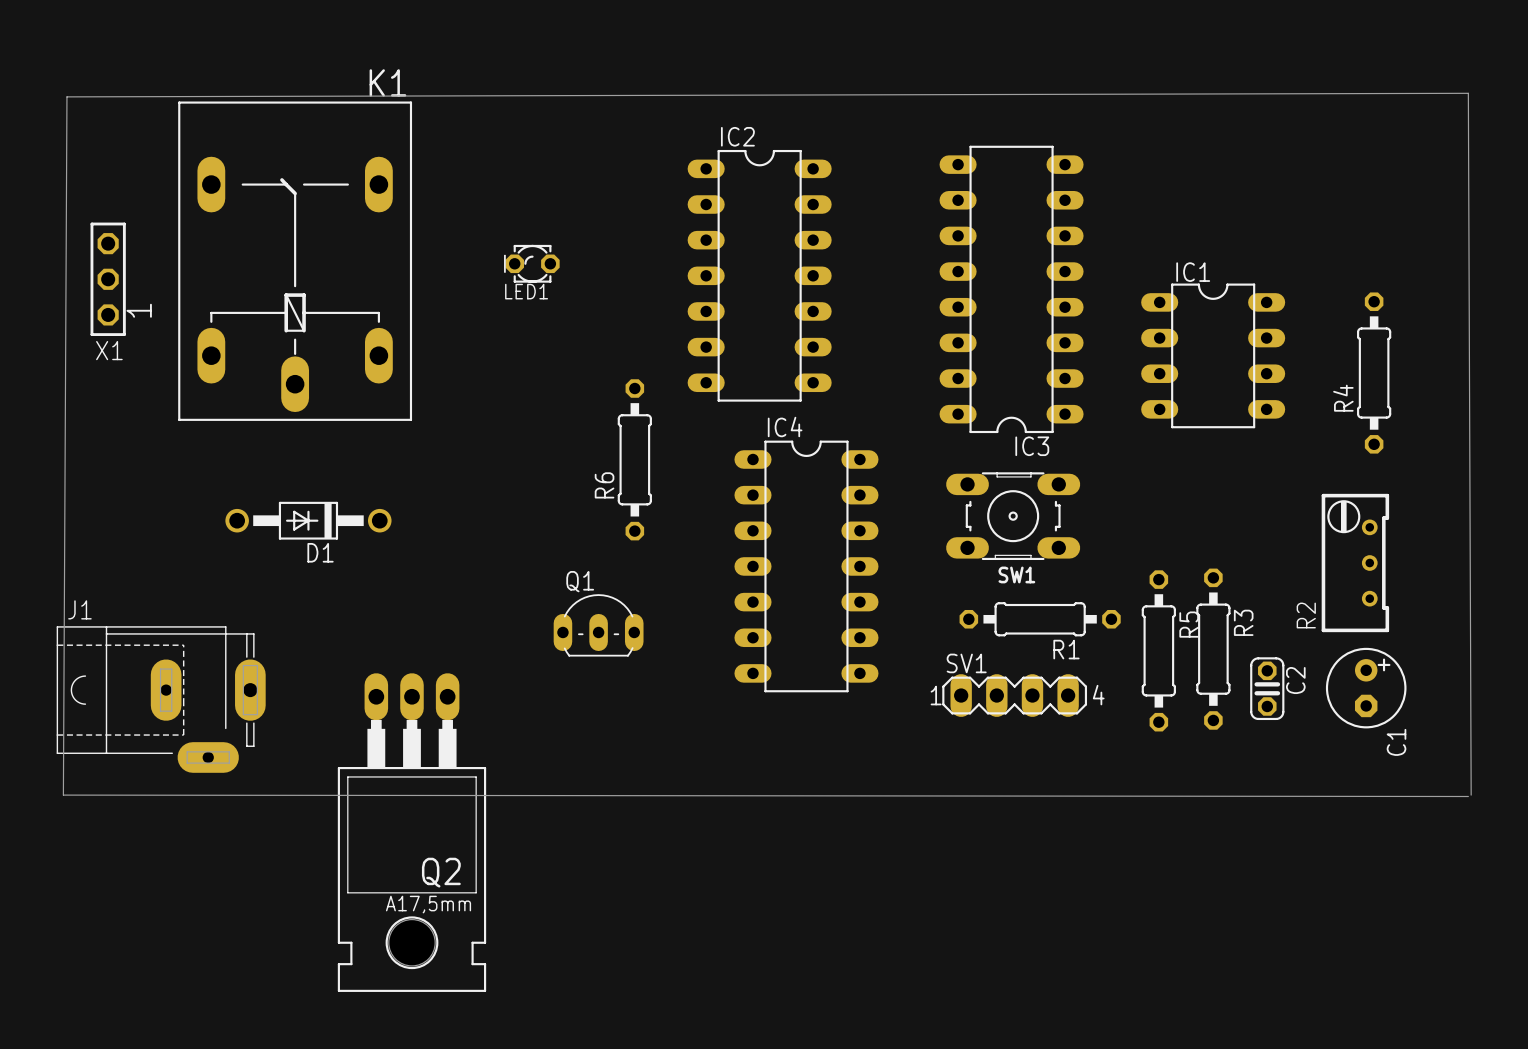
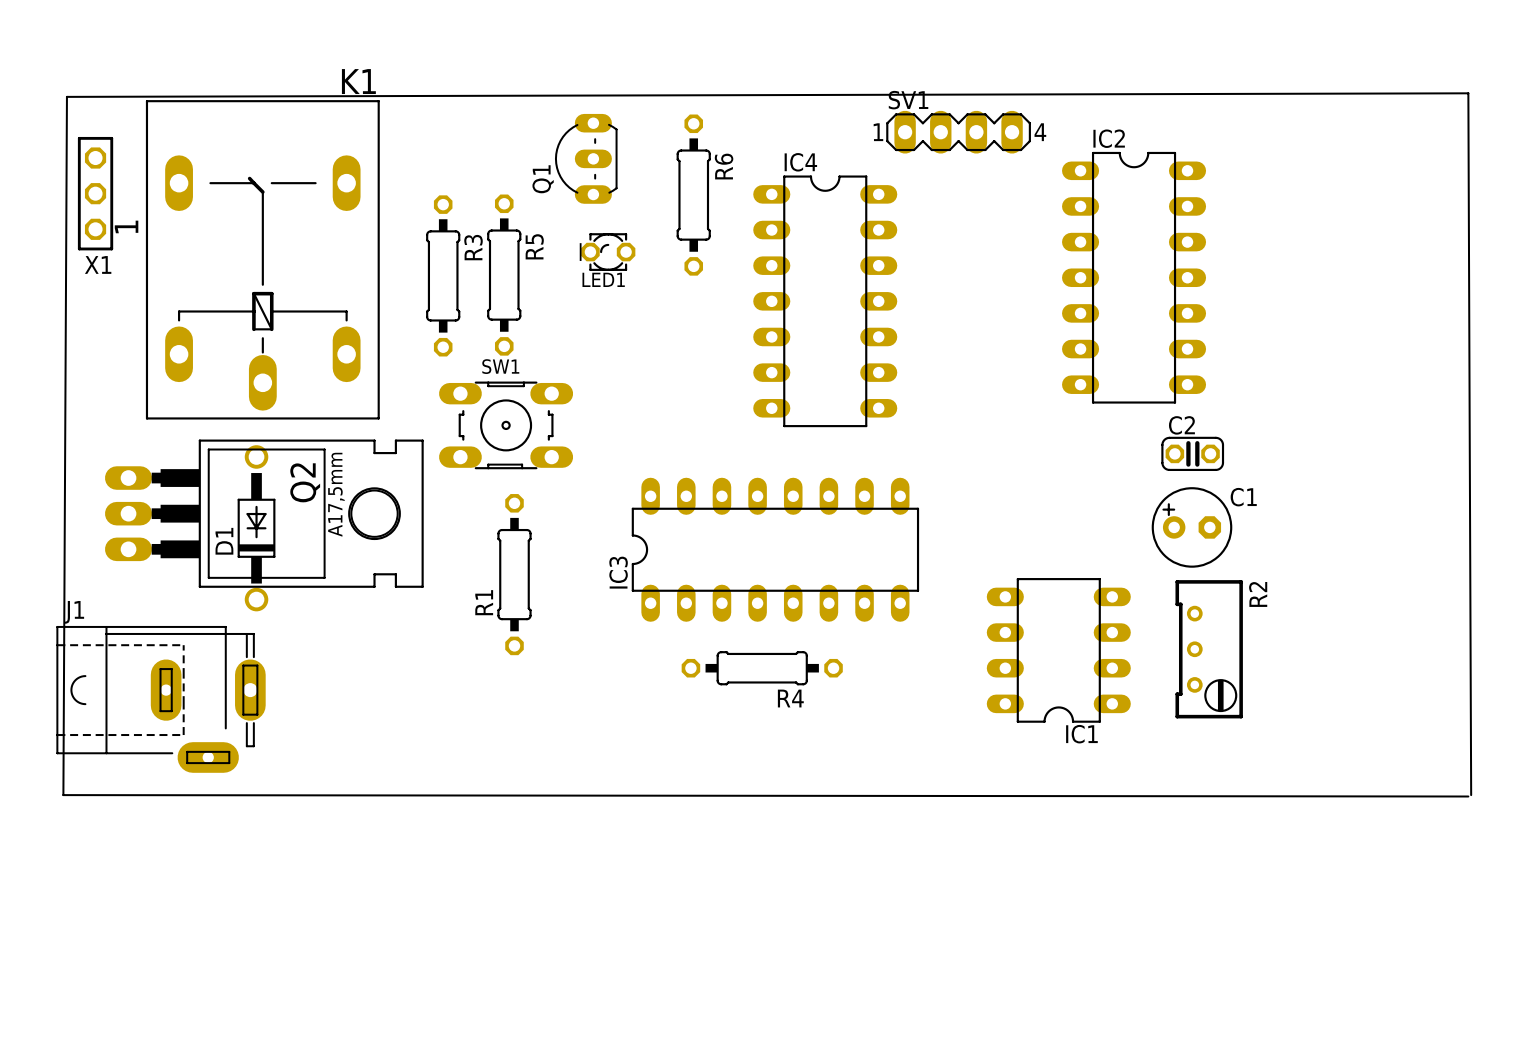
K1 position: (295, 261) -> (262, 259)
LED1 position: (531, 263) -> (607, 252)
IC2 position: (759, 275) -> (1134, 277)
X1 position: (108, 279) -> (95, 193)
IC3 rotation: 0° (1011, 289) -> 90° clockwise (775, 549)
IC3 position: (1011, 289) -> (775, 549)
IC1 rotation: 0° (1213, 355) -> 180° (1058, 650)
IC1 position: (1213, 355) -> (1058, 650)
R4 rotation: 0° (1374, 373) -> 90° clockwise (762, 668)
R4 position: (1374, 373) -> (762, 668)
R4 name position: R4 (1343, 398) -> R4 (790, 698)
R6 position: (634, 459) -> (693, 195)
R6 name position: R6 (604, 485) -> R6 (724, 166)
SW1 rotation: 0° (1013, 516) -> 180° (506, 425)
SW1 position: (1013, 516) -> (506, 425)
D1 rotation: 0° (308, 520) -> 90° clockwise (256, 528)
R2 rotation: 0° (1355, 563) -> 180° (1209, 649)
R2 position: (1355, 563) -> (1209, 649)
IC4 position: (806, 566) -> (825, 301)
R1 rotation: 0° (1040, 619) -> 90° clockwise (514, 574)
R1 position: (1040, 619) -> (514, 574)
Q1 rotation: 0° (598, 625) -> 90° counterclockwise (586, 158)
Q1 position: (598, 625) -> (586, 158)
R3 position: (1213, 649) -> (443, 275)
R5 position: (1158, 650) -> (504, 275)
C2 rotation: 0° (1267, 688) -> 90° counterclockwise (1192, 453)
C2 position: (1267, 688) -> (1192, 453)
C1 rotation: 0° (1366, 688) -> 90° counterclockwise (1192, 527)
C1 position: (1366, 688) -> (1192, 527)
SV1 position: (1014, 695) -> (958, 132)
Q2 rotation: 0° (411, 832) -> 90° counterclockwise (264, 513)
Q2 position: (411, 832) -> (264, 513)

